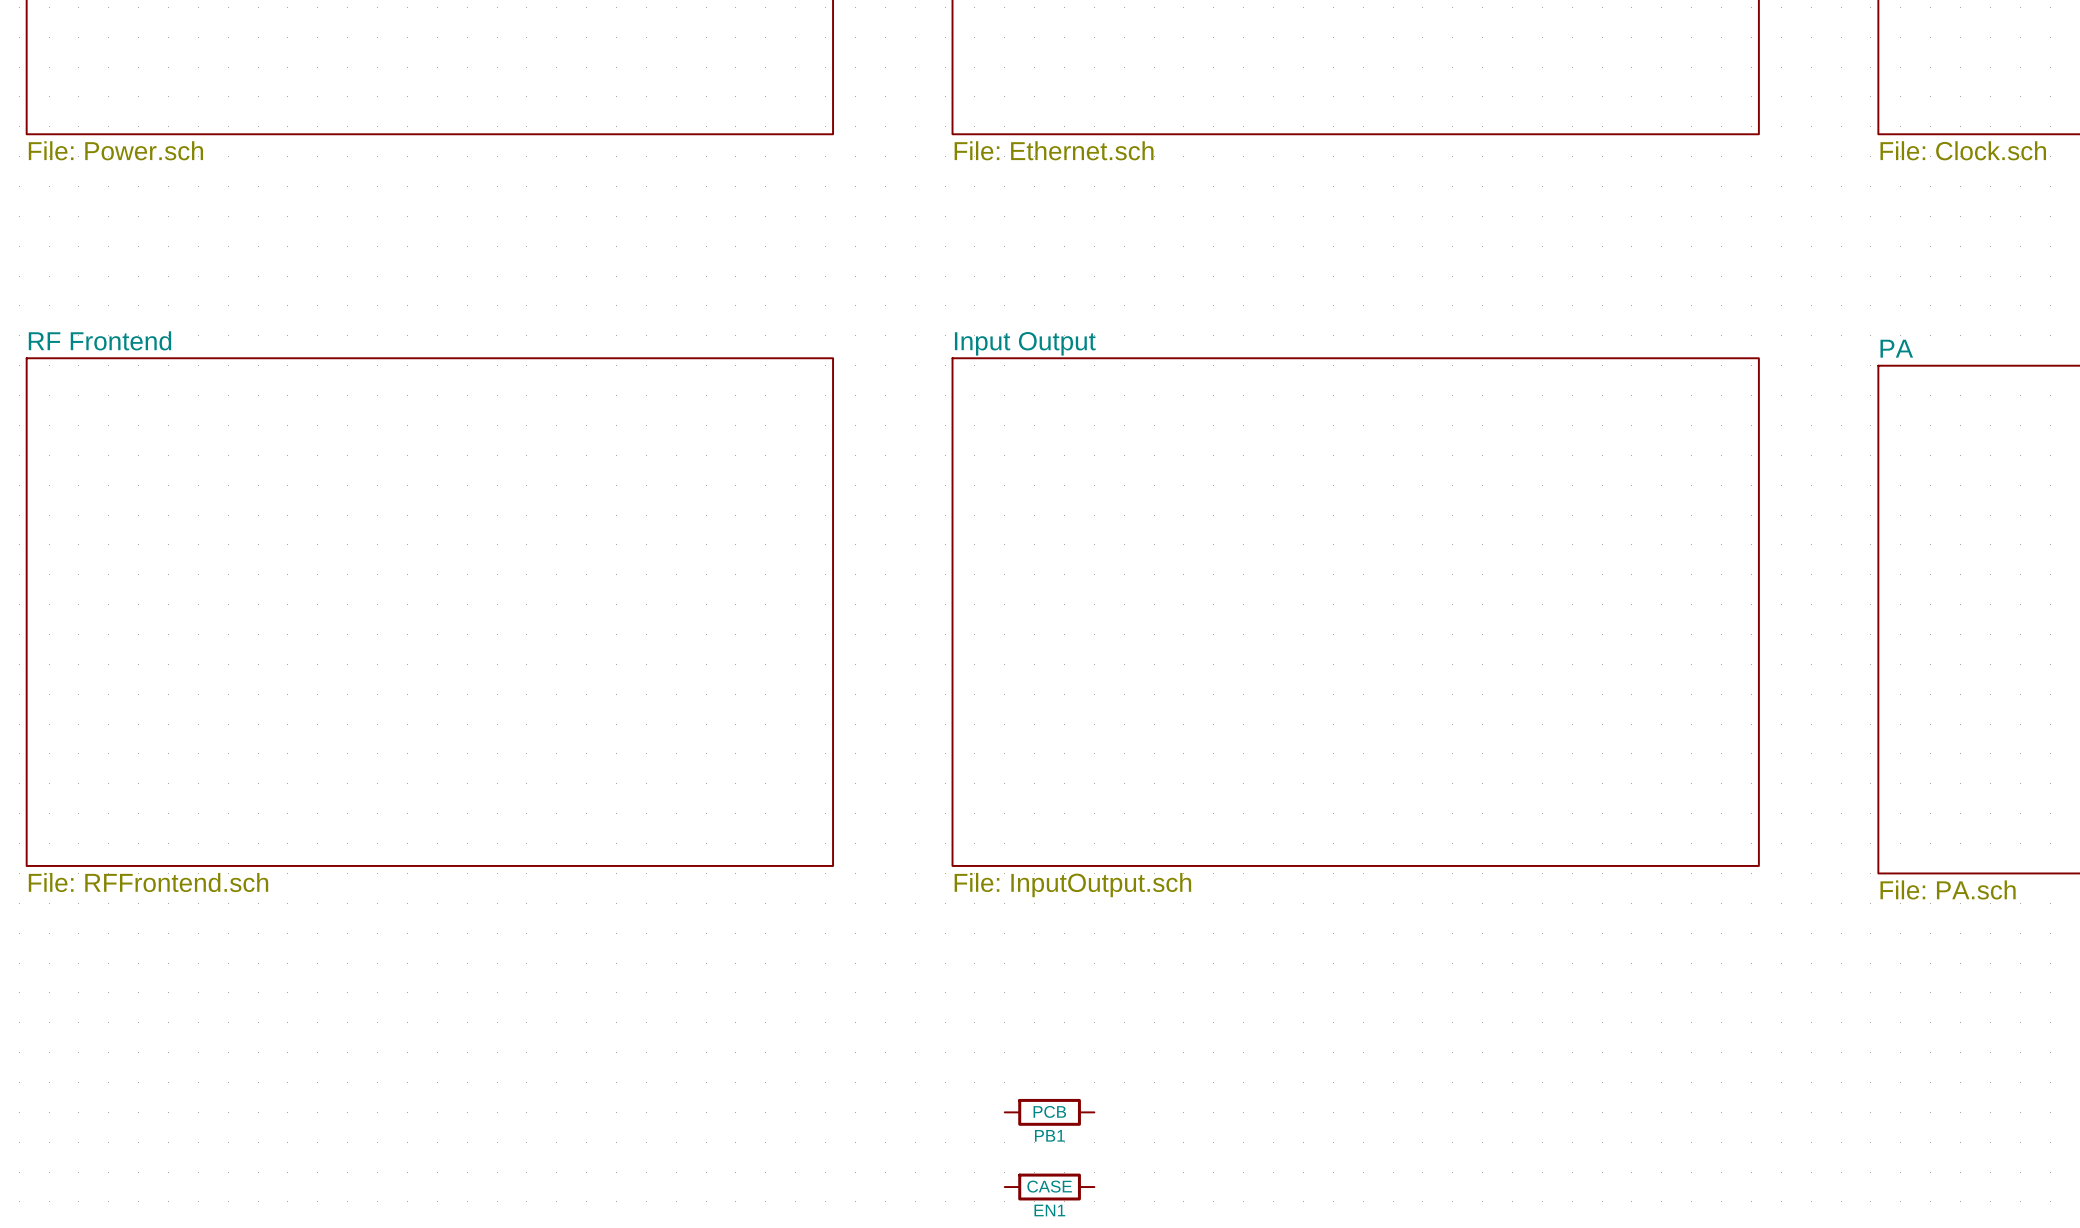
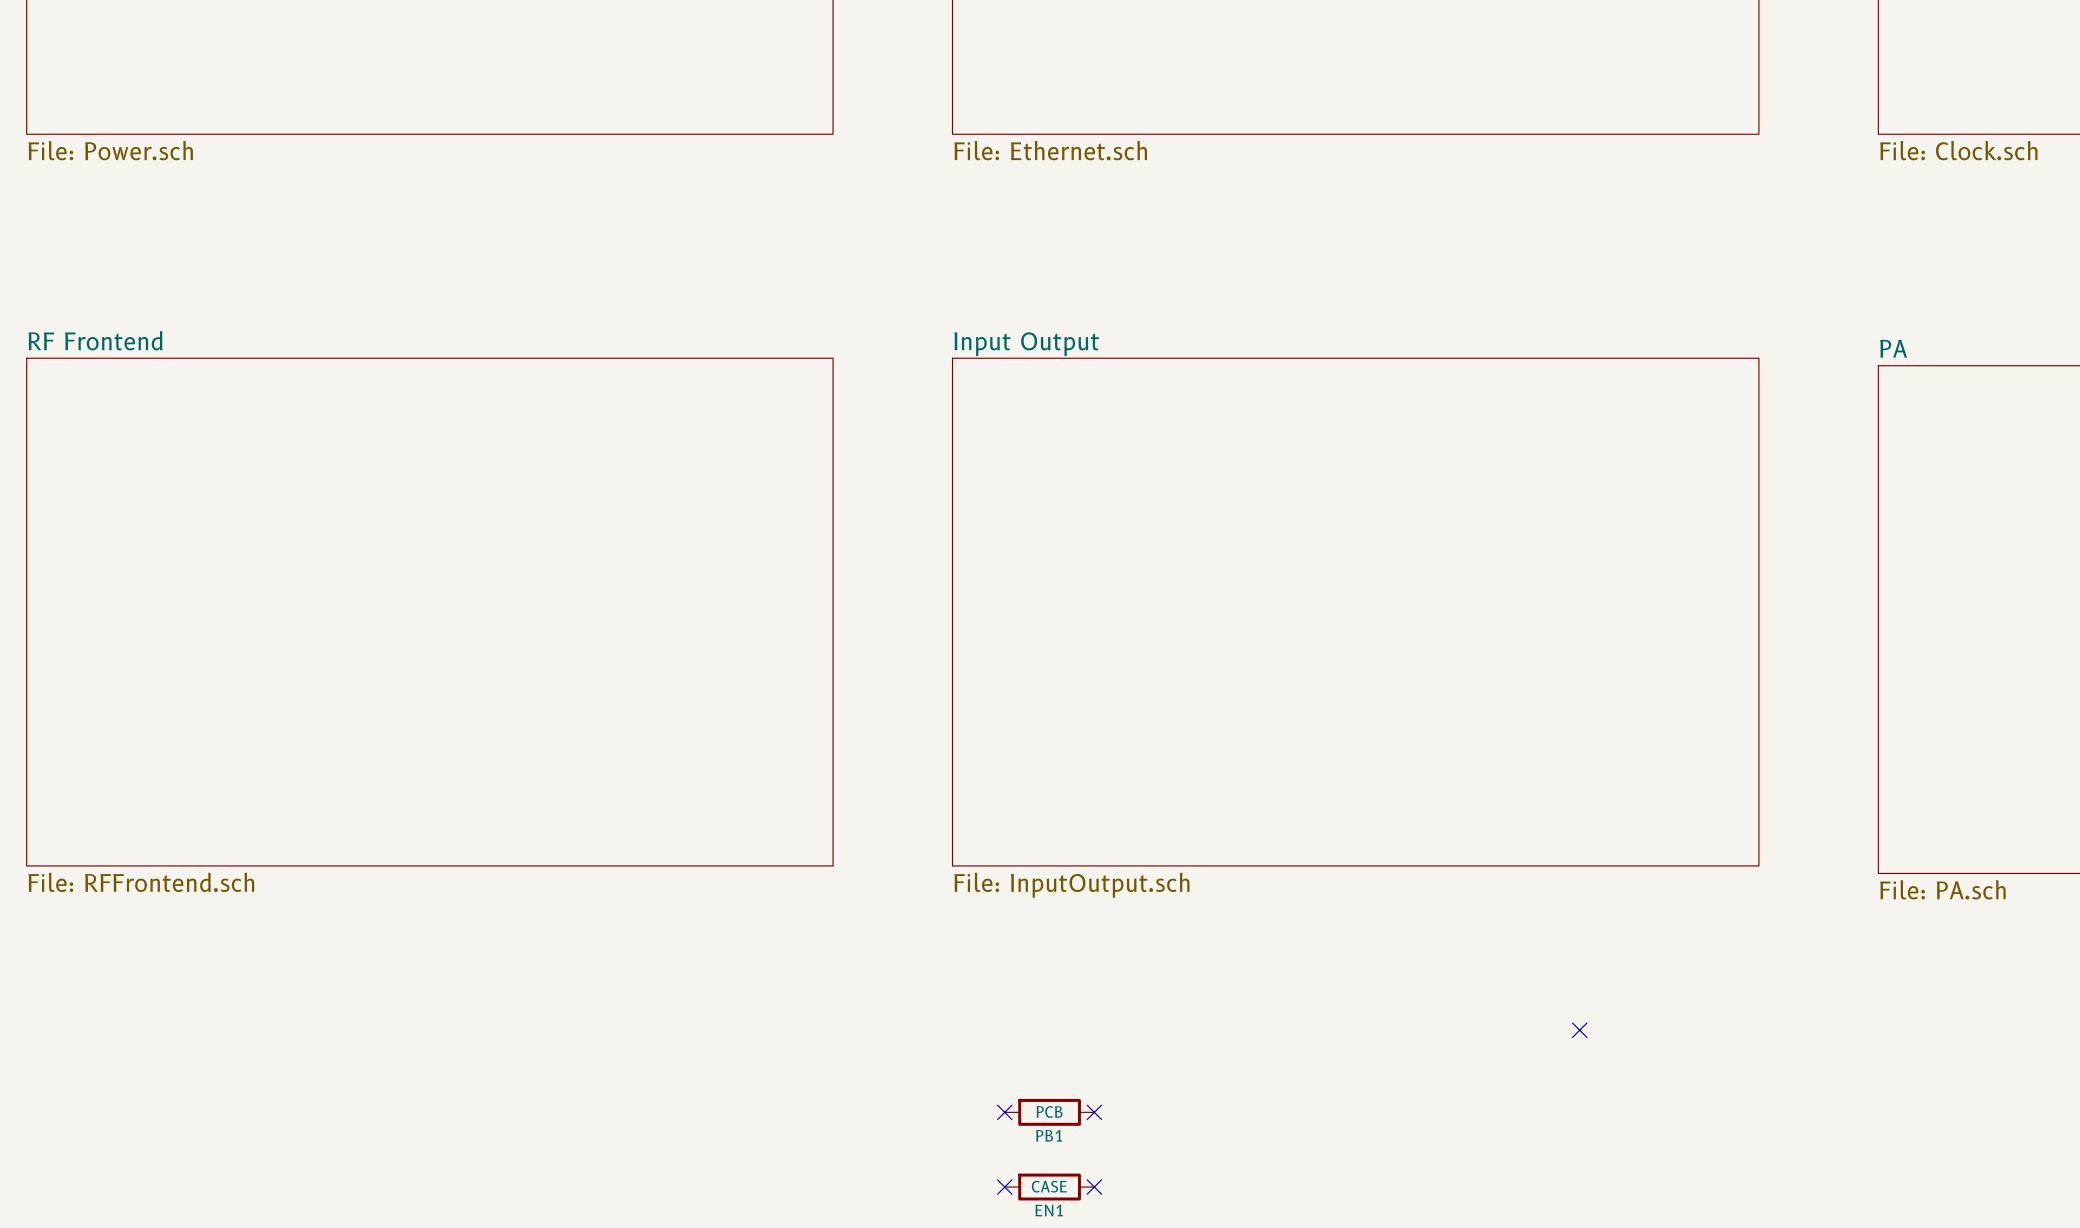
no-connect mark: none -> (1579, 1030)
no-connect mark: none -> (1004, 1112)
no-connect mark: none -> (1094, 1112)
no-connect mark: none -> (1004, 1187)
no-connect mark: none -> (1094, 1187)

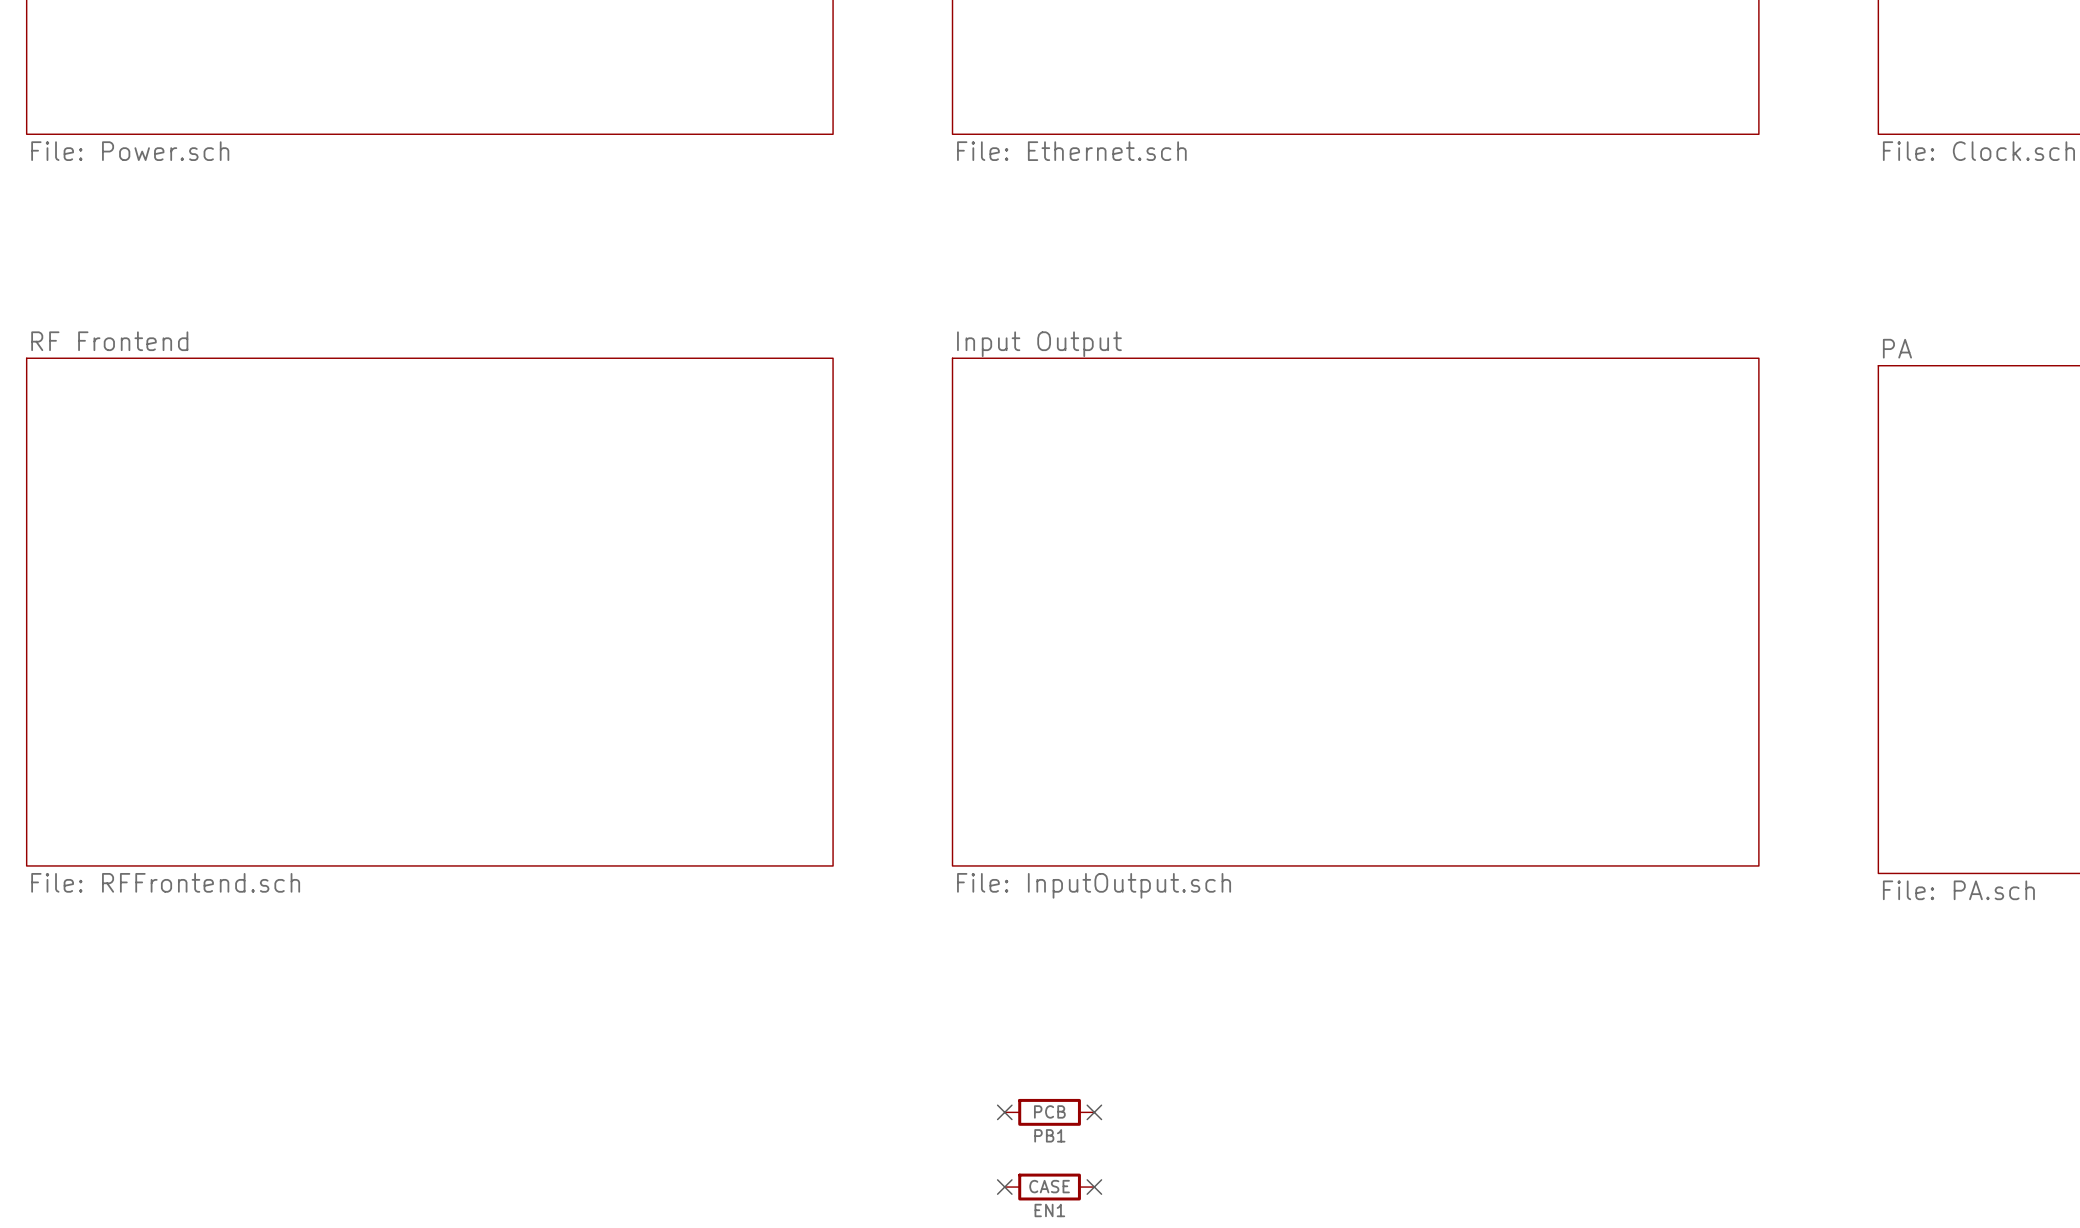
no-connect mark: (1579, 1030) -> none

